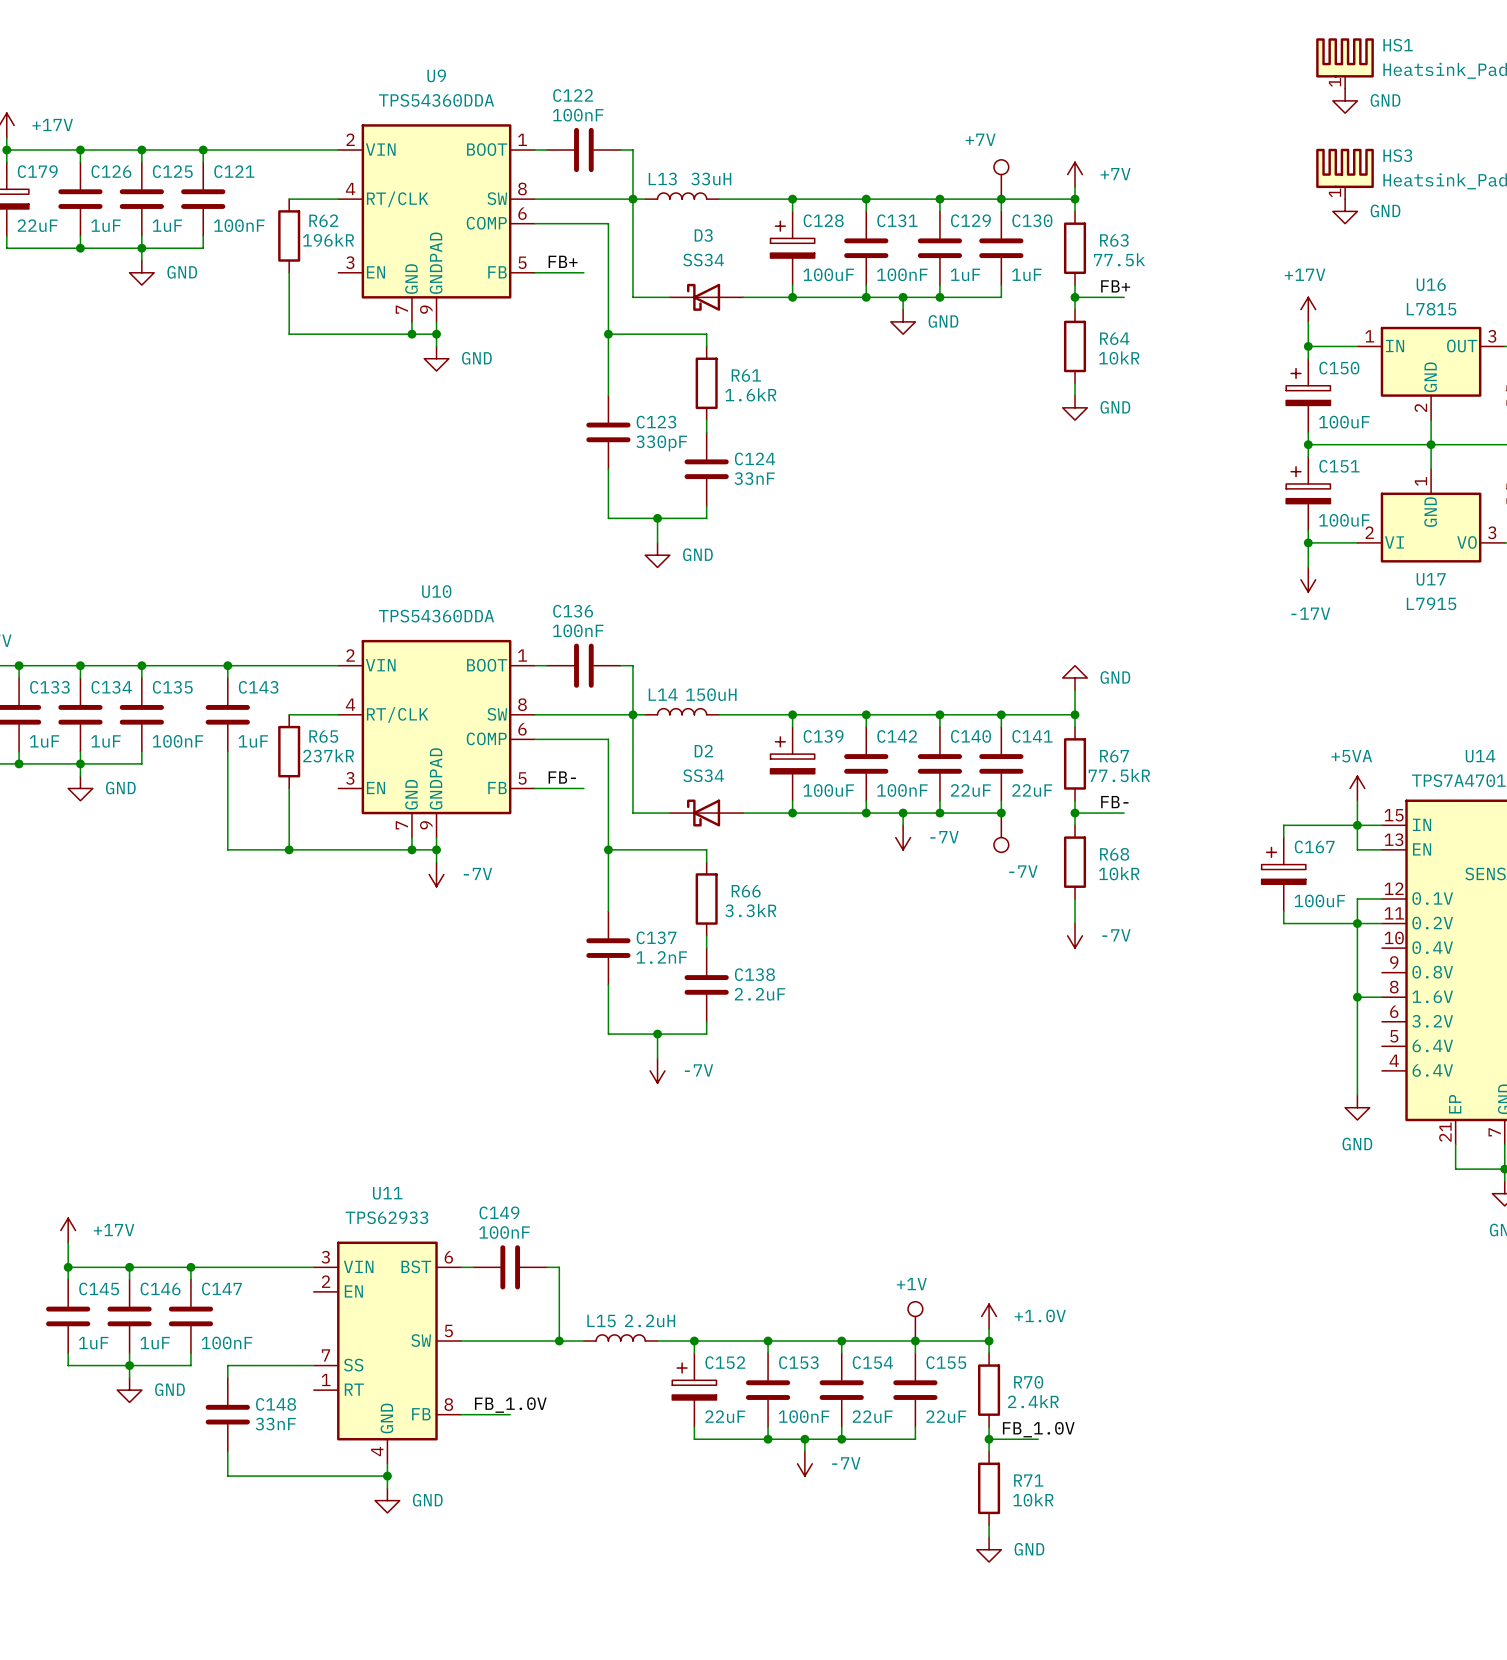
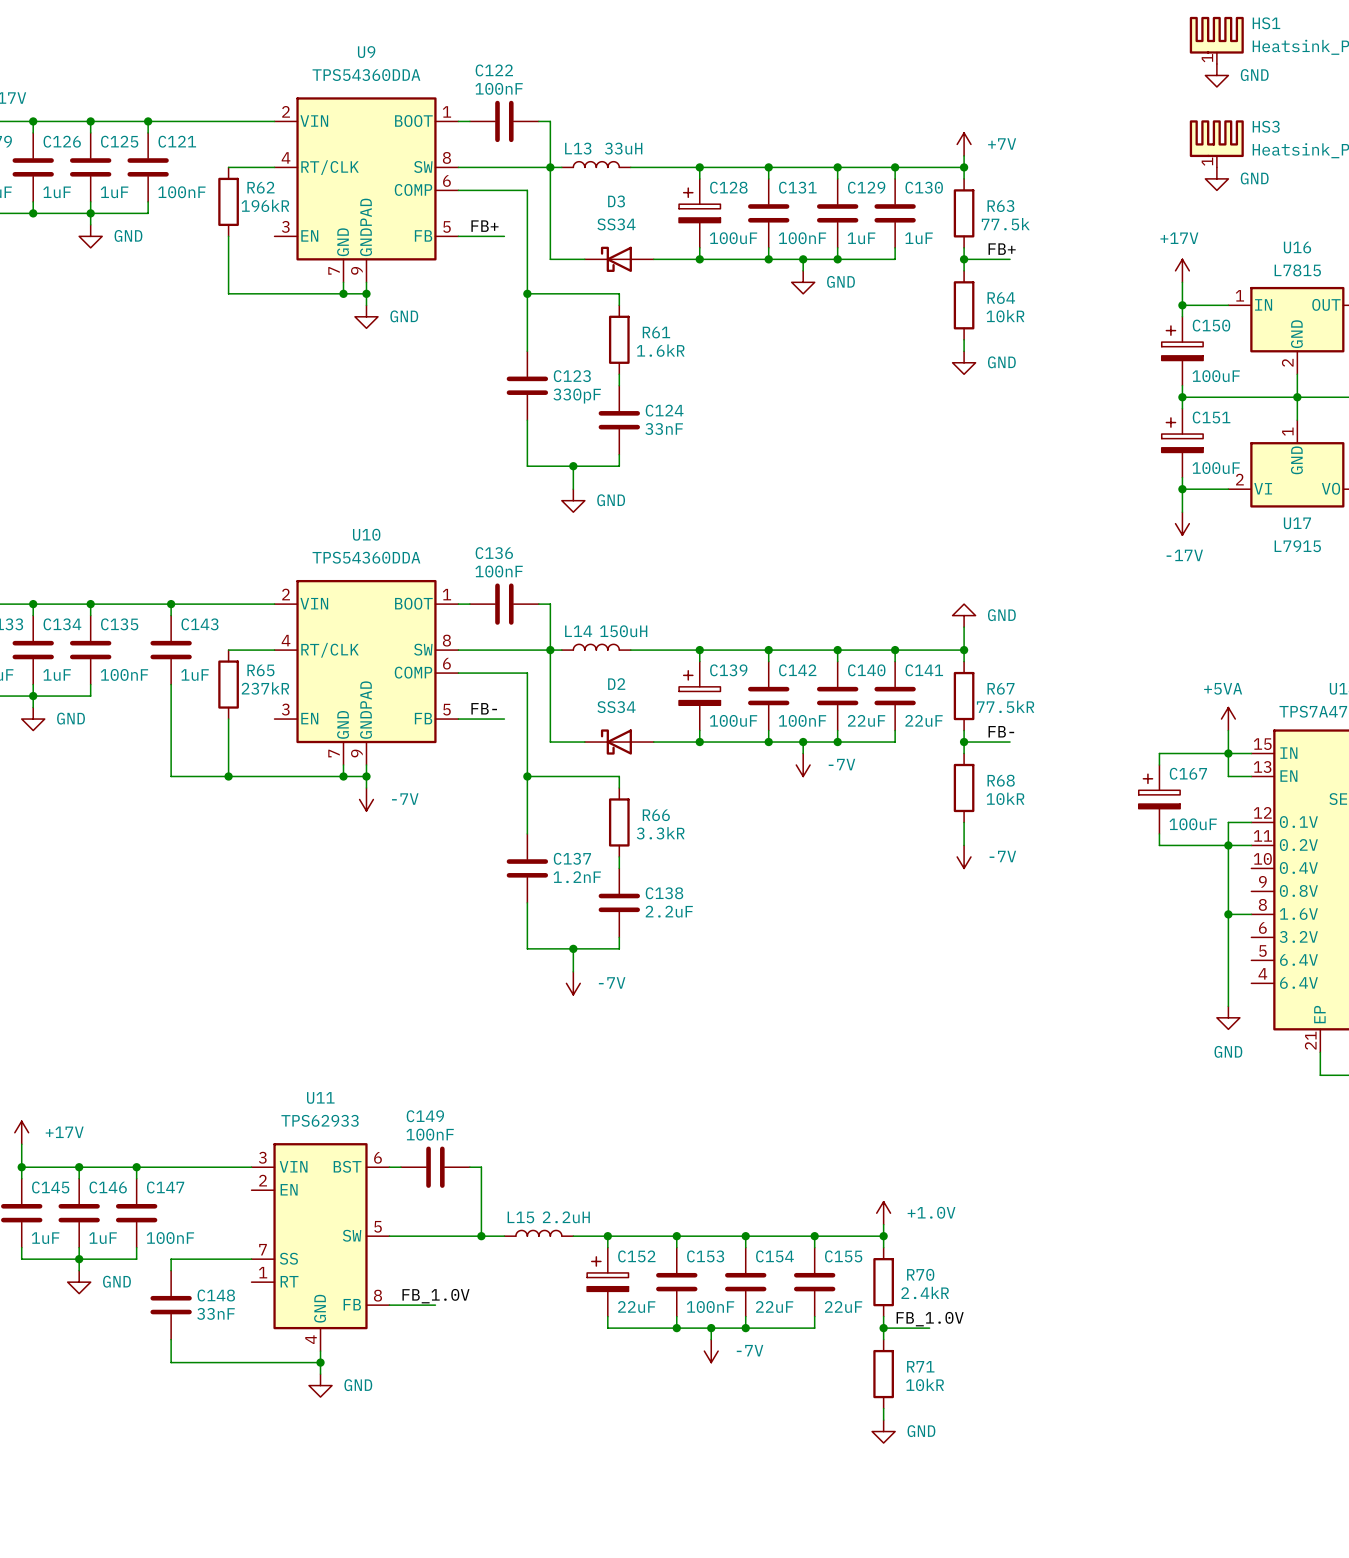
part: +7V (1001, 179) -> none
junction: (1001, 813) -> none
part: -7V (1001, 832) -> none
part: +1V (915, 1321) -> none

